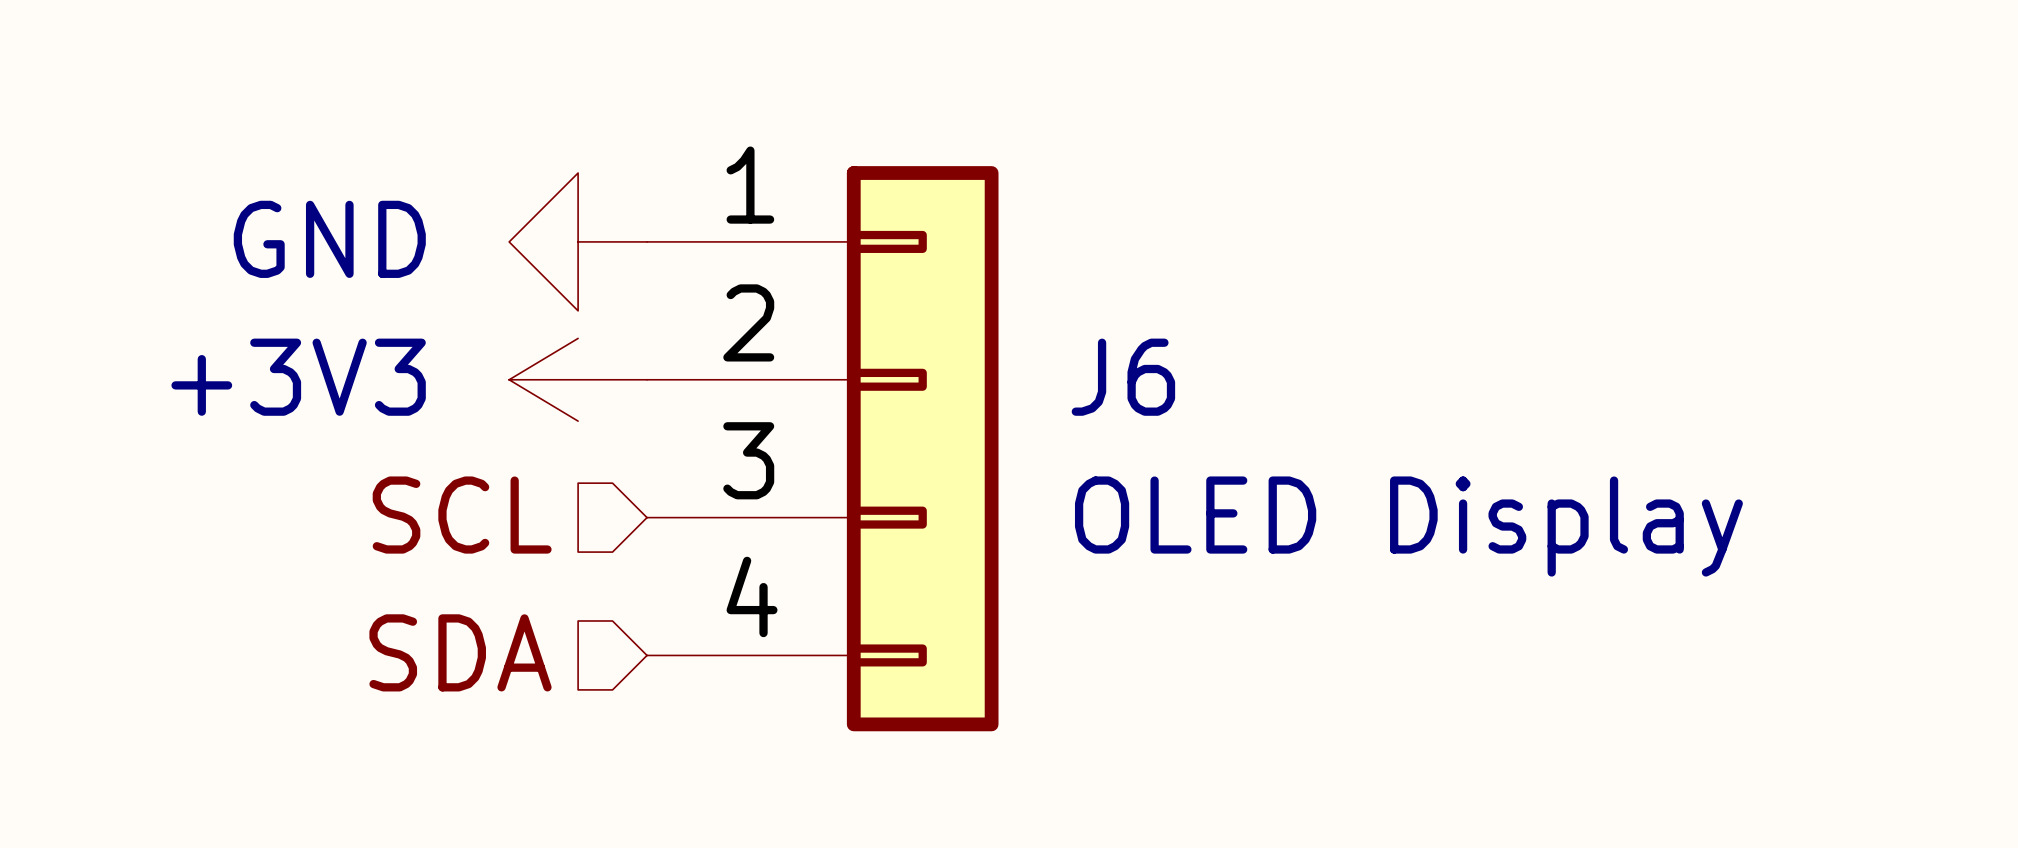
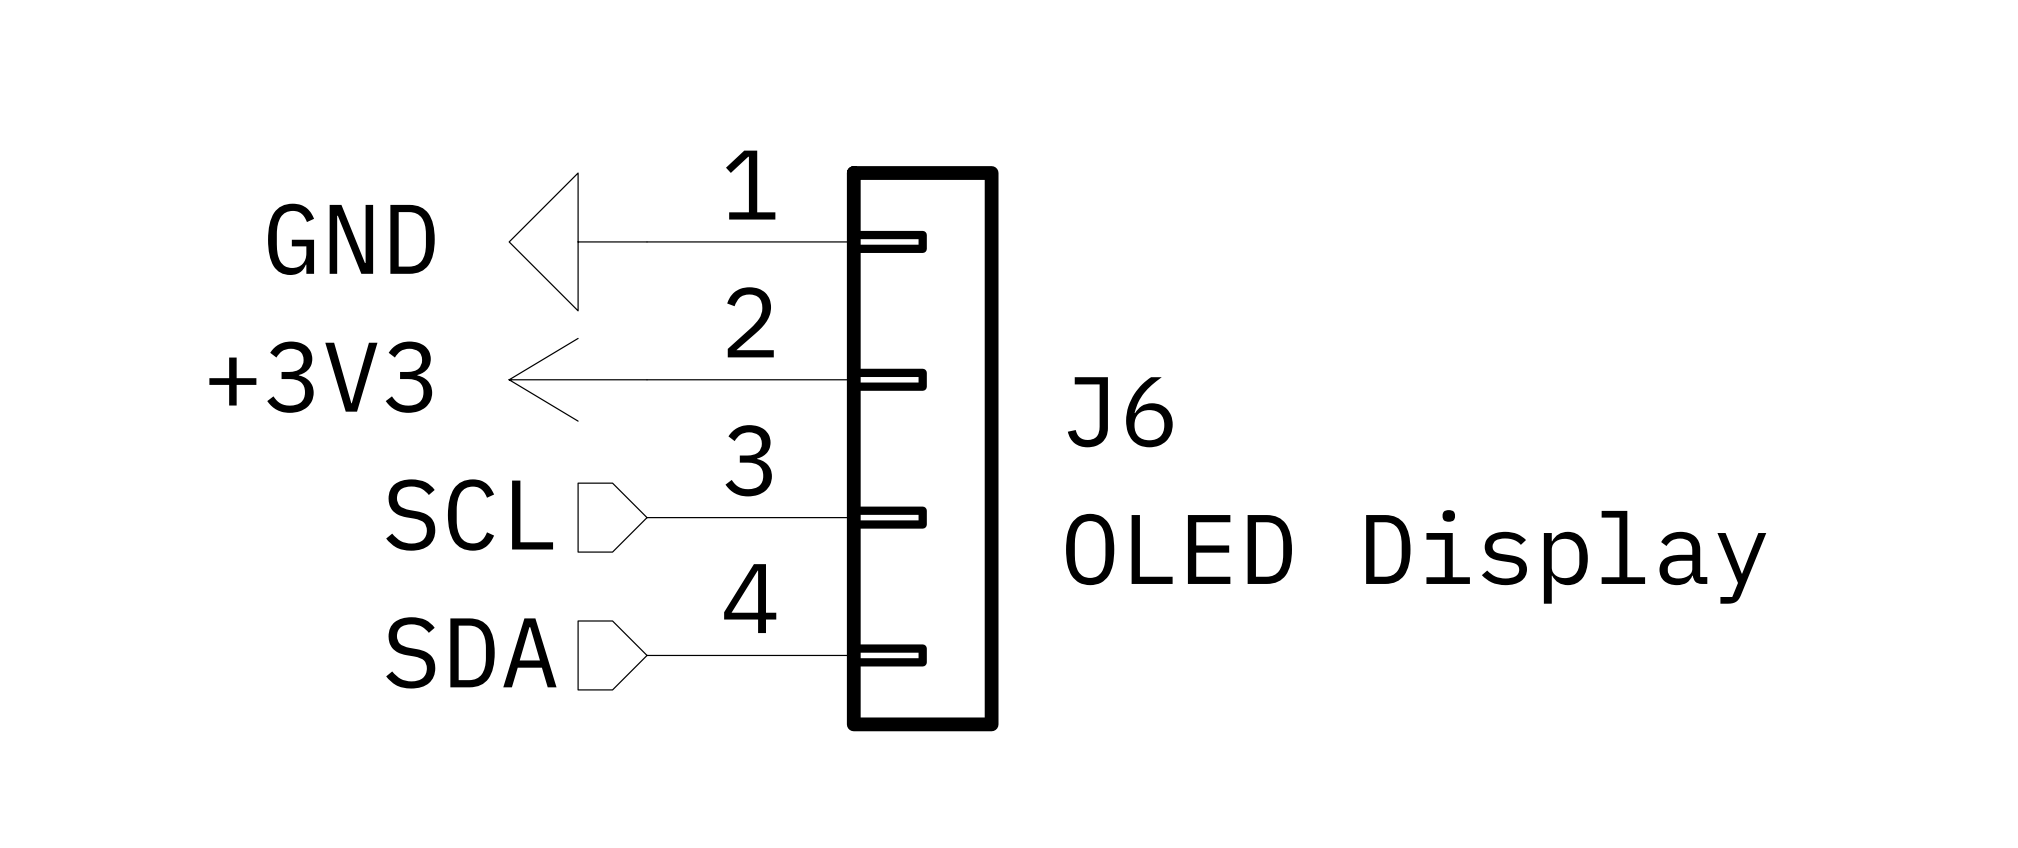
J6 name position: J6 (1123, 377) -> J6 (1120, 412)
J6 value position: OLED Display (1408, 526) -> OLED Display (1416, 556)

